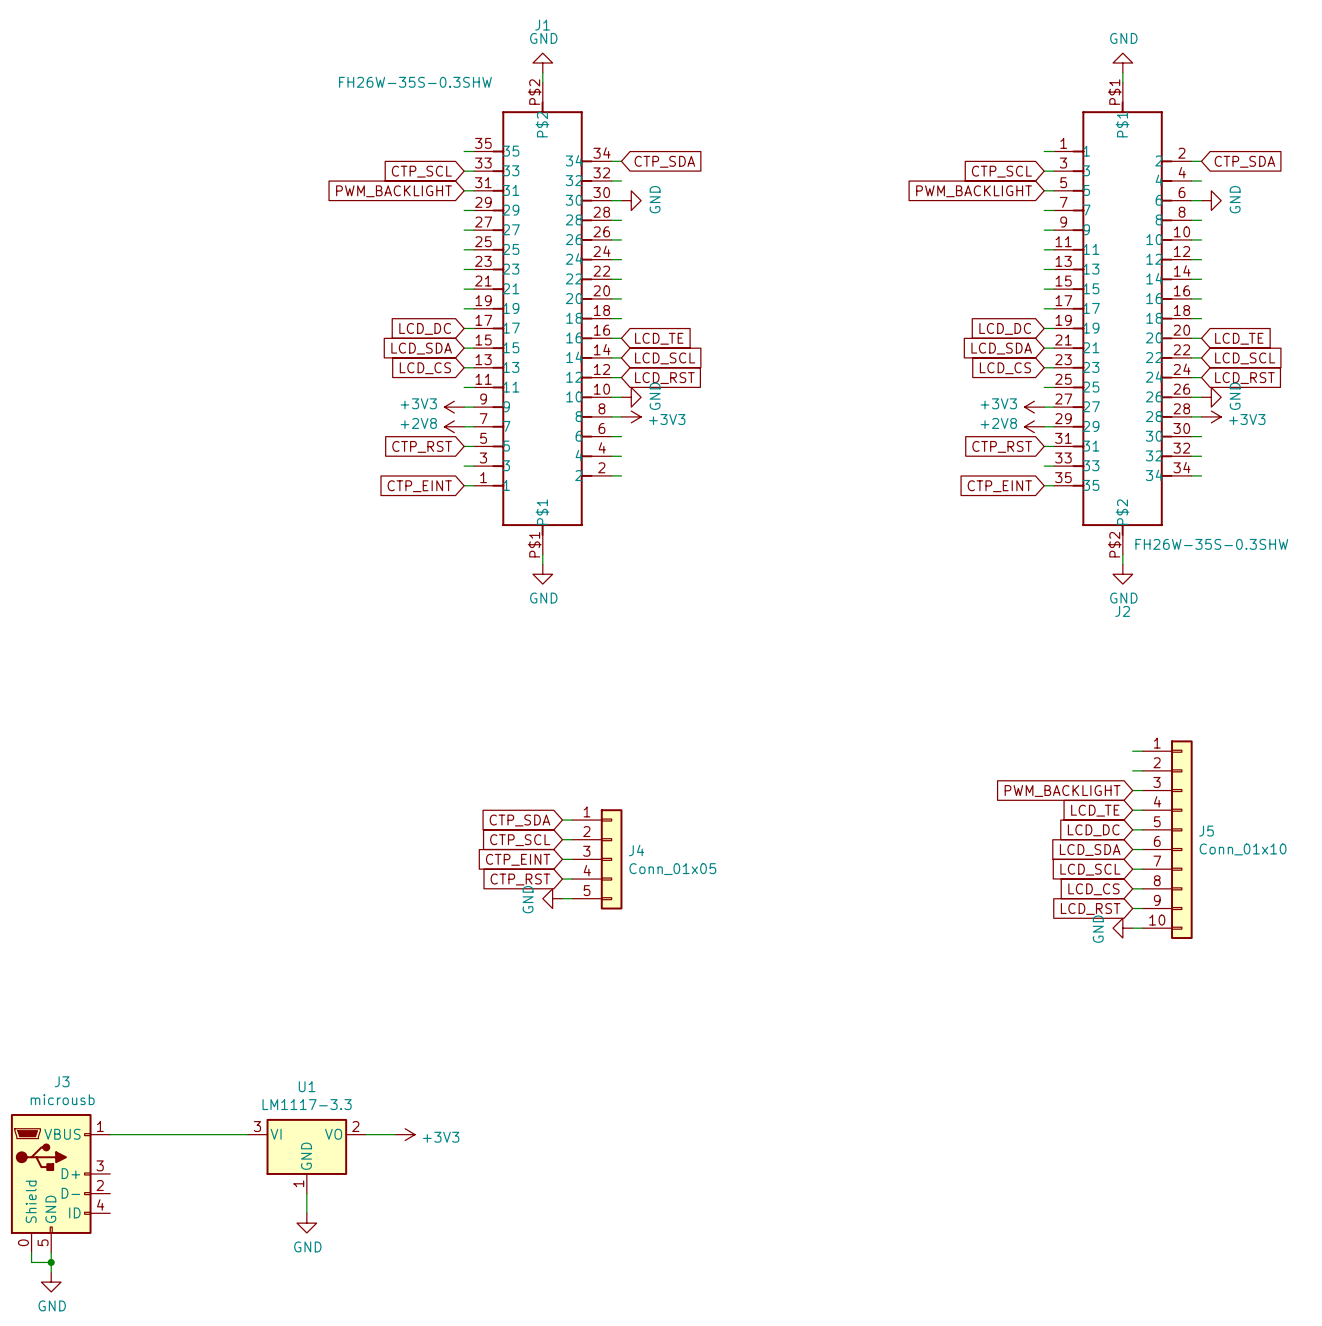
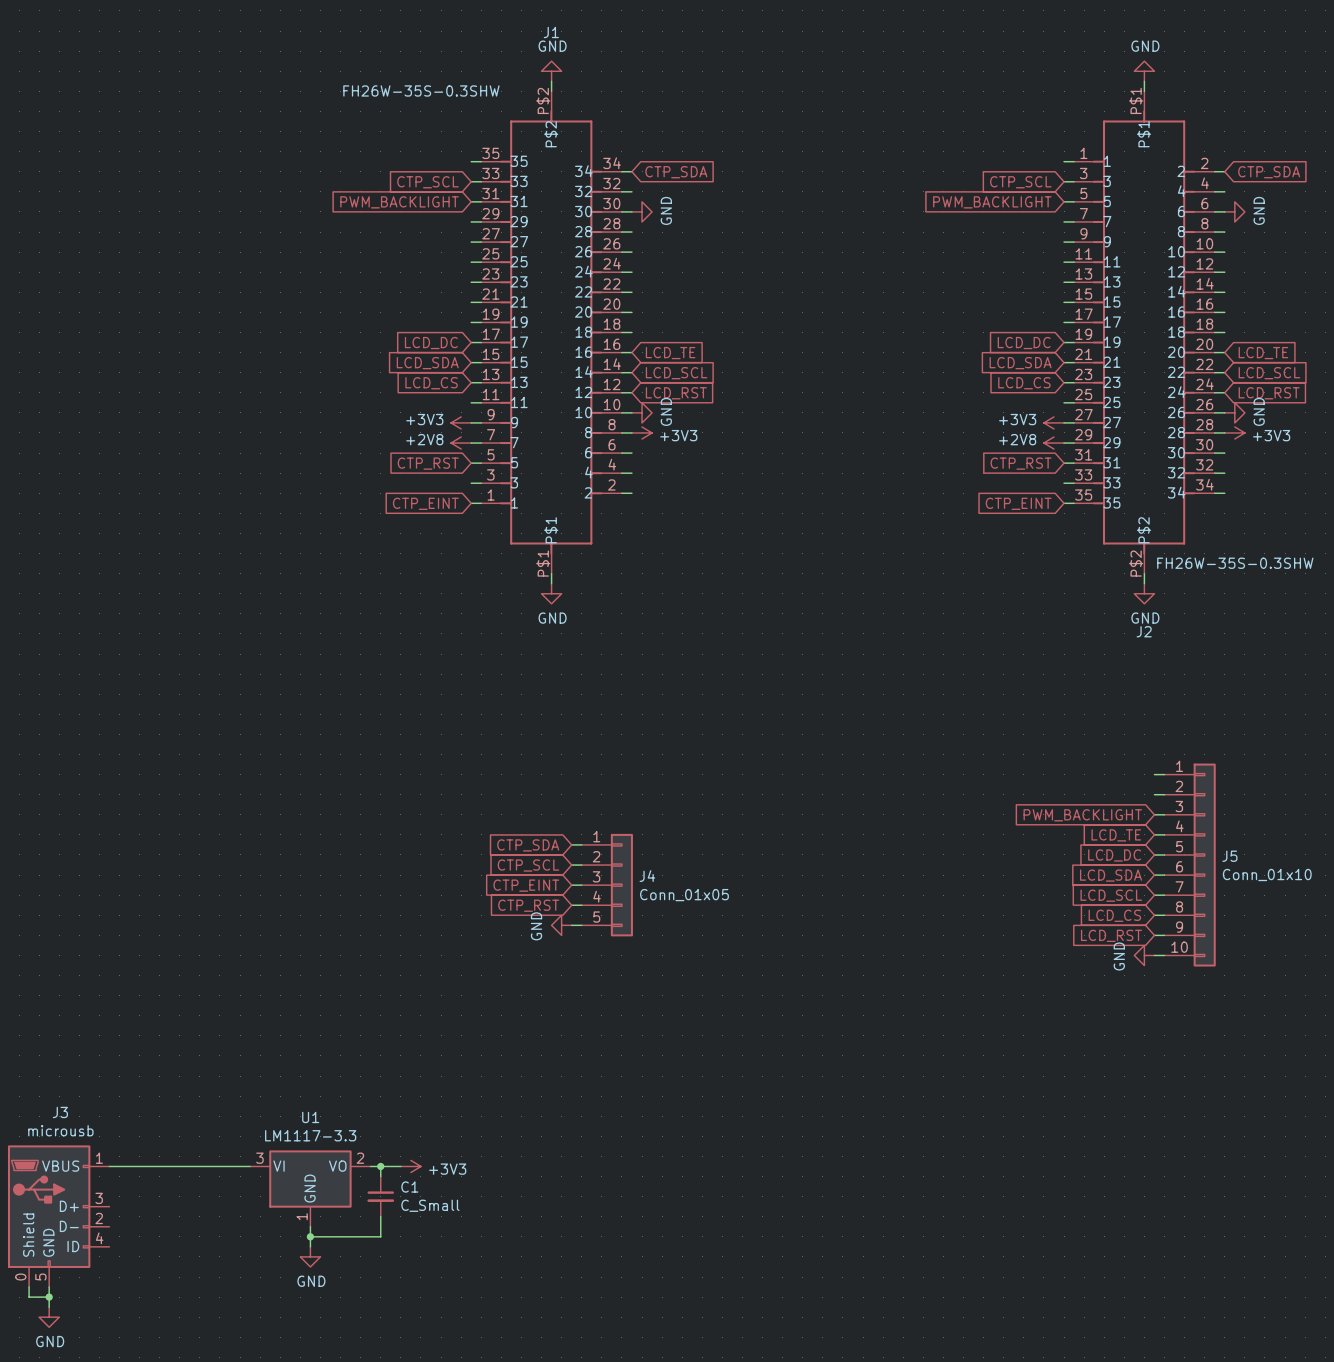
wire: none -> (380, 1166) (380, 1176)
junction: none -> (380, 1166)
C1: none -> C_Small (380, 1196)
wire: none -> (380, 1216) (380, 1236) (310, 1236)
junction: none -> (310, 1236)

